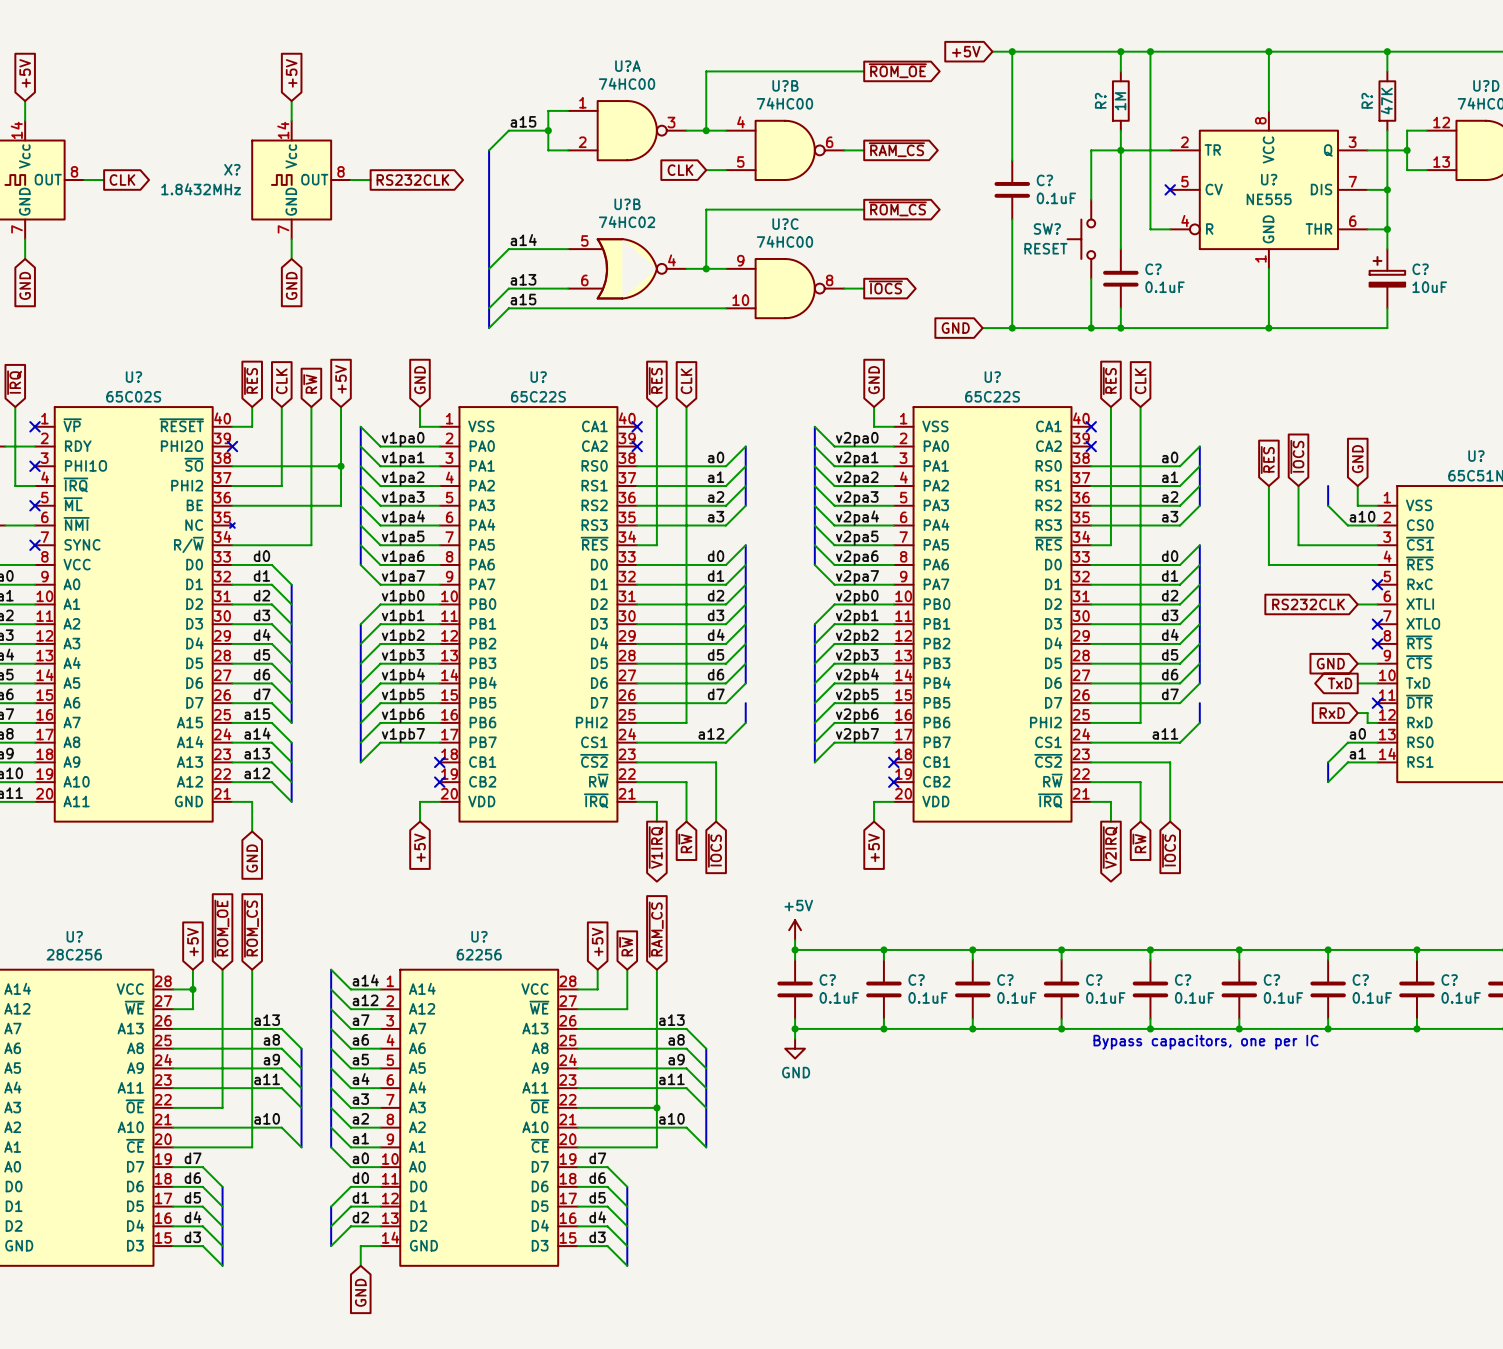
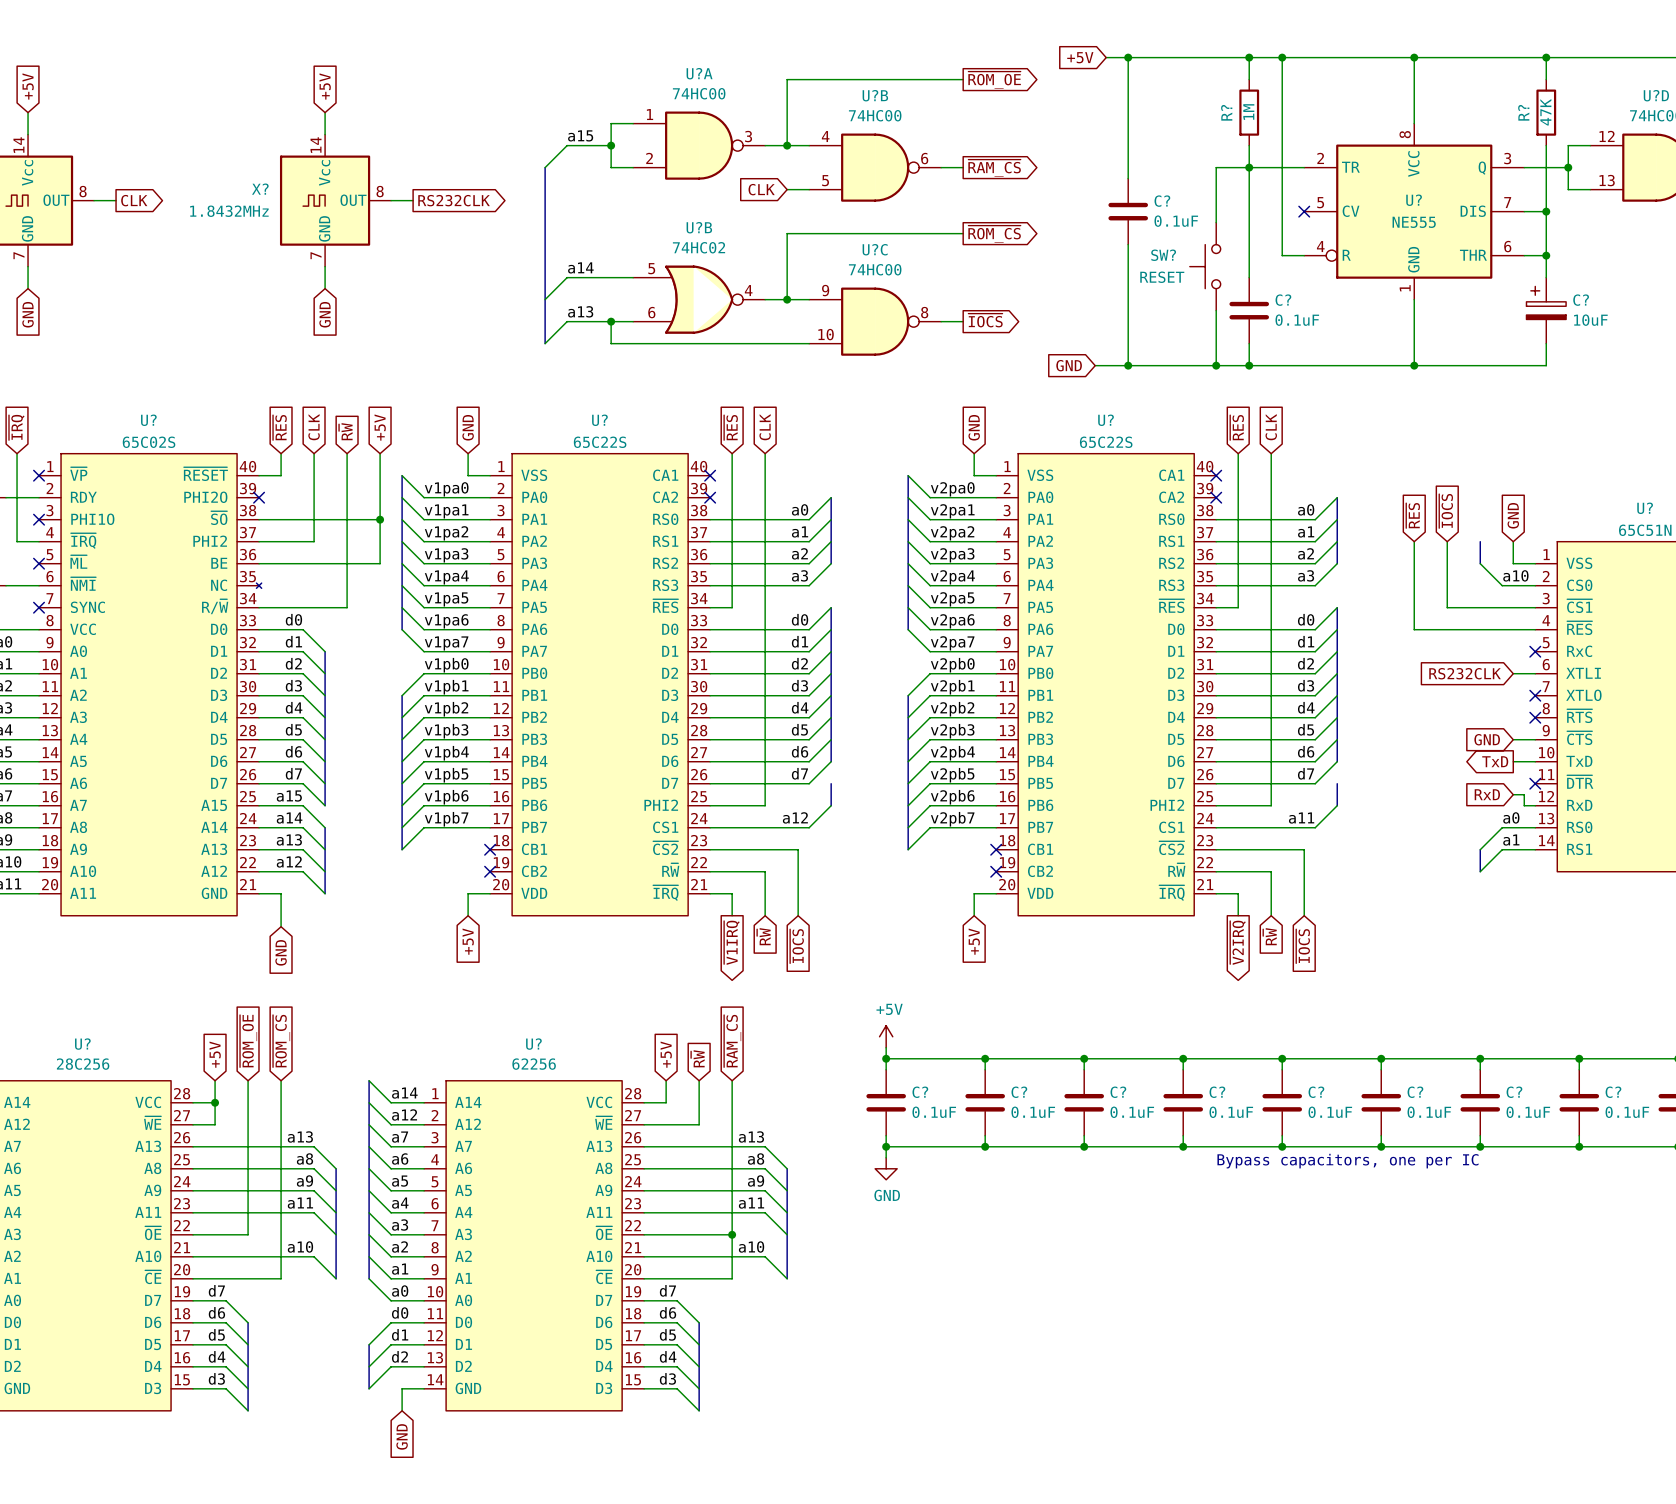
junction: none -> (611, 321)
label: a15 (523, 299) -> none
bus: (489, 308) (489, 328) -> none
wire: (548, 308) (508, 308) (489, 328) -> (611, 343) (611, 321)

